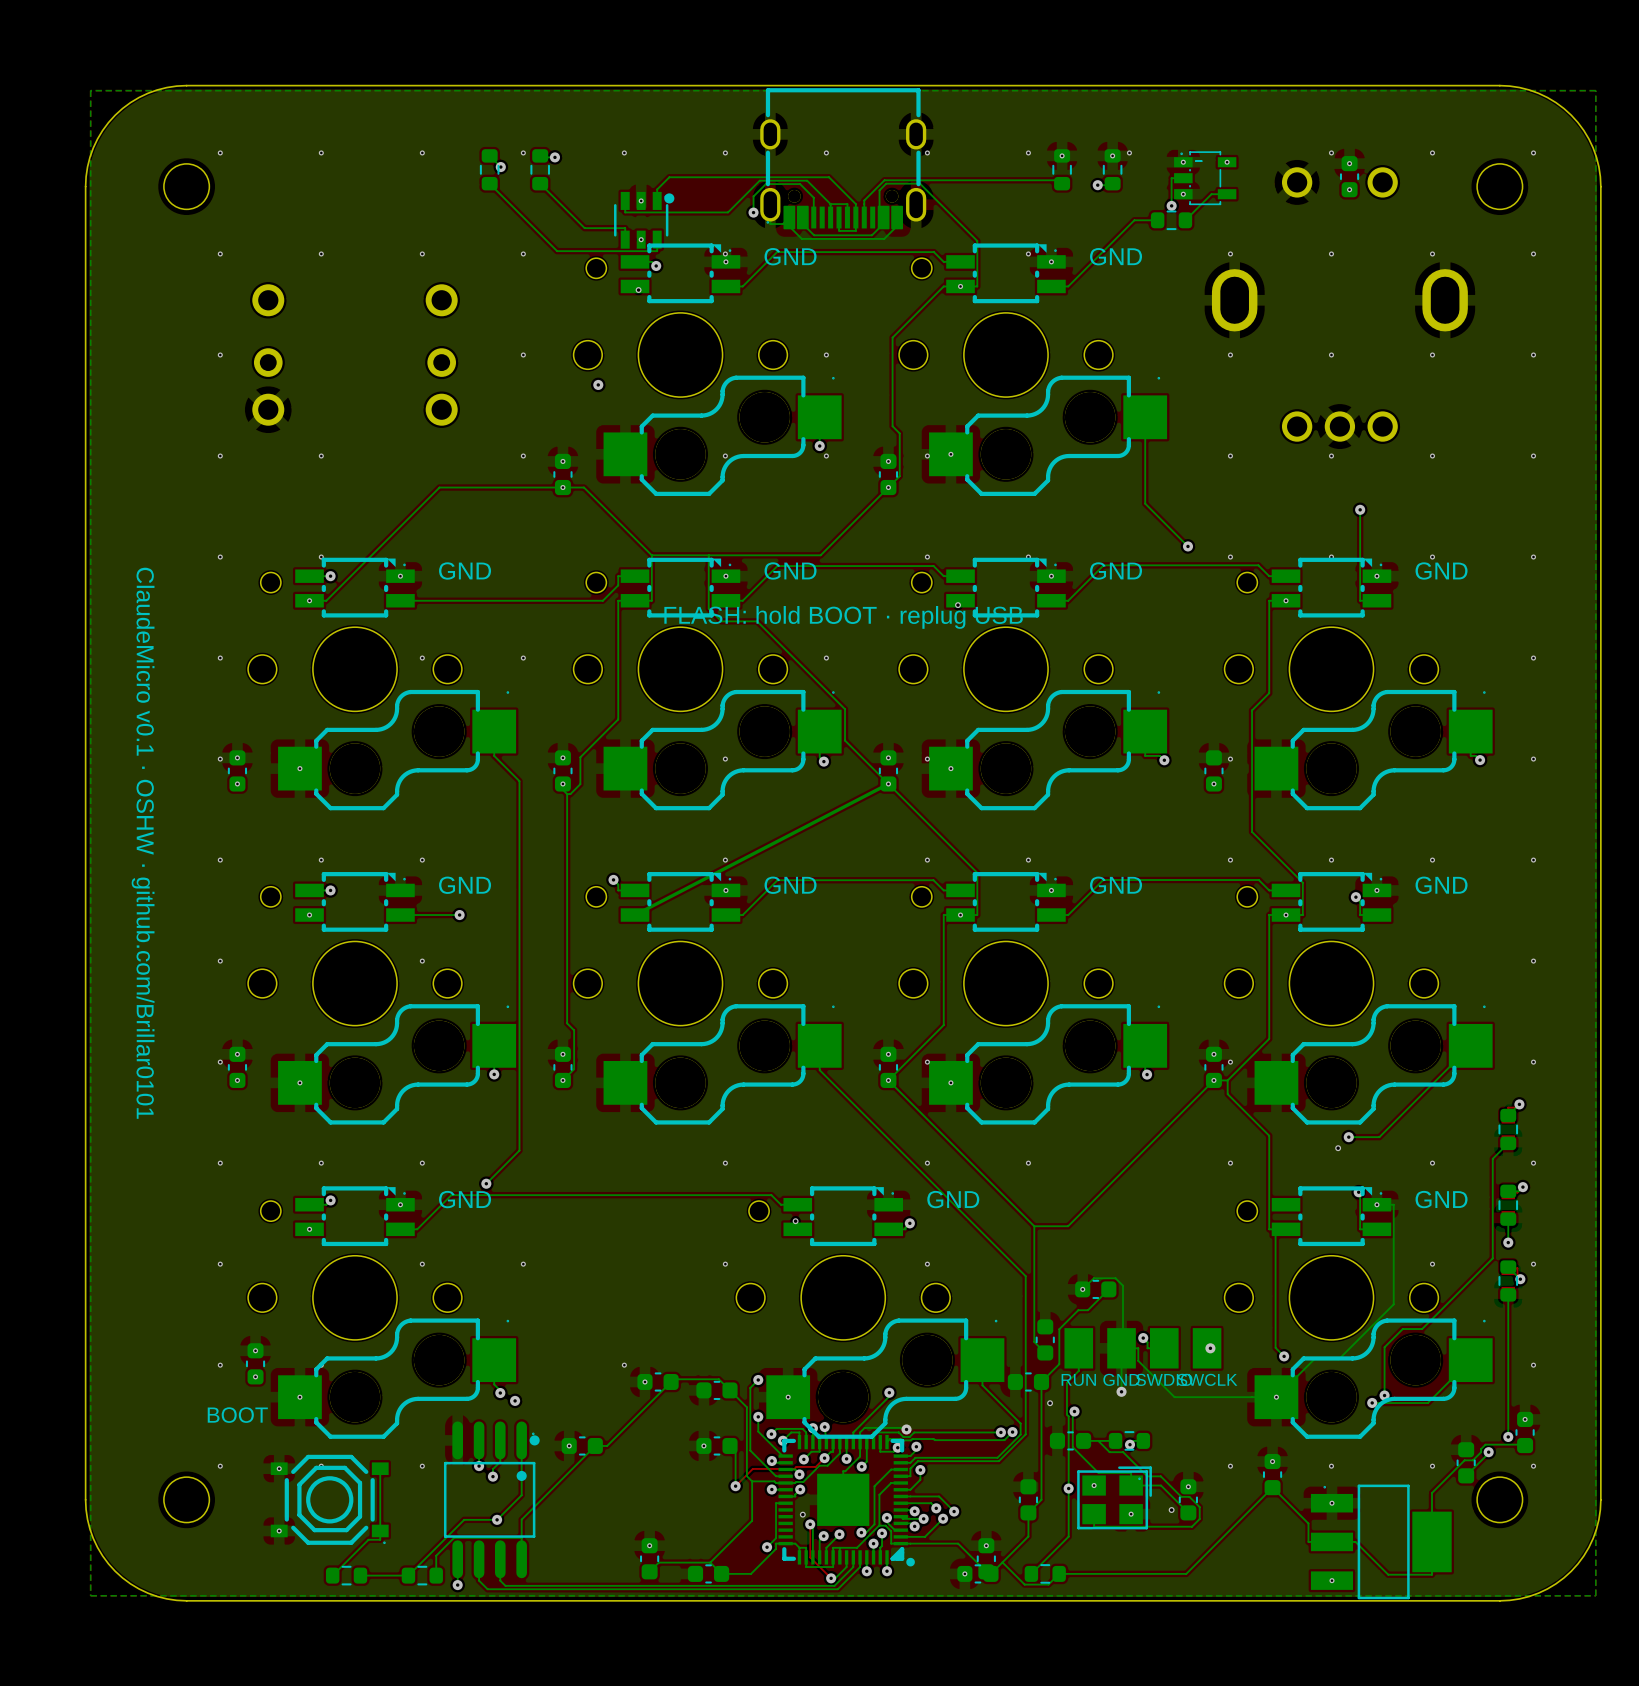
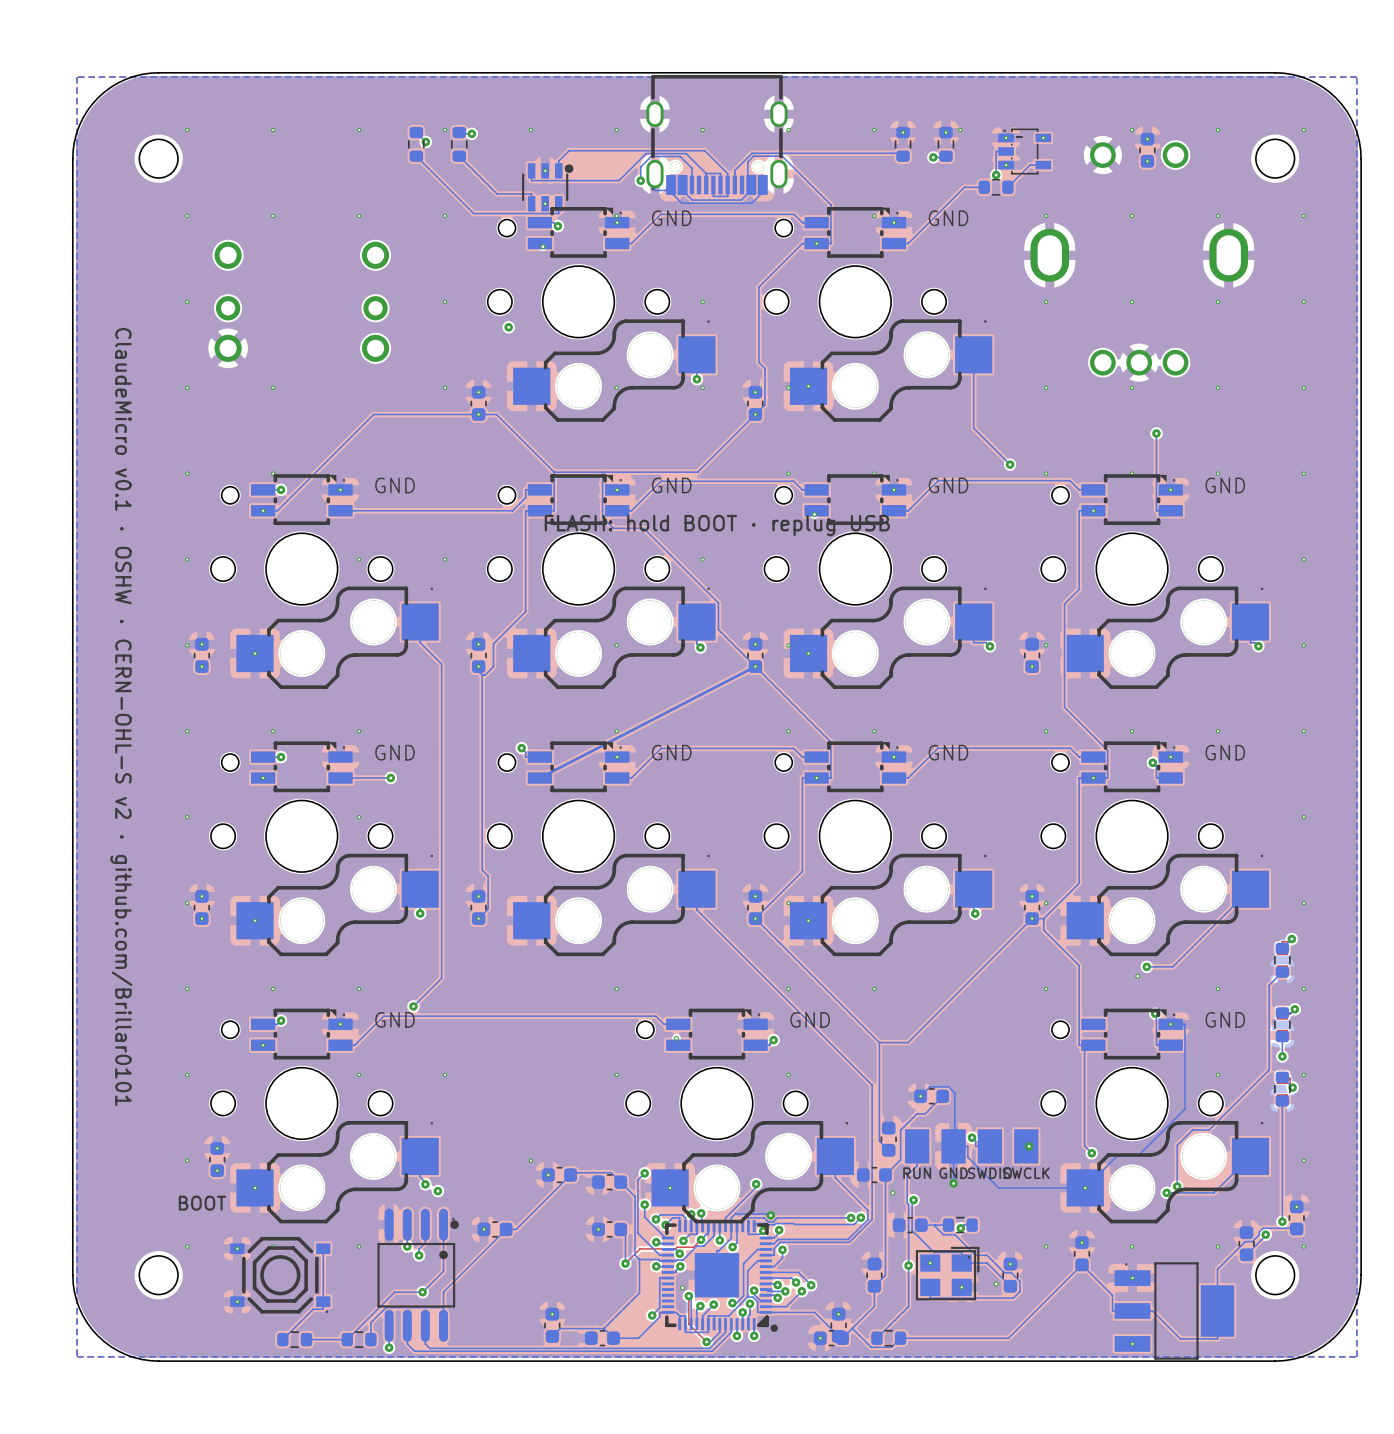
text: ClaudeMicro v0.1 · OSHW · github.com/Brillar0101 (143, 843) -> ClaudeMicro v0.1 · OSHW · CERN-OHL-S v2 · github.com/Brillar0101 (121, 716)

